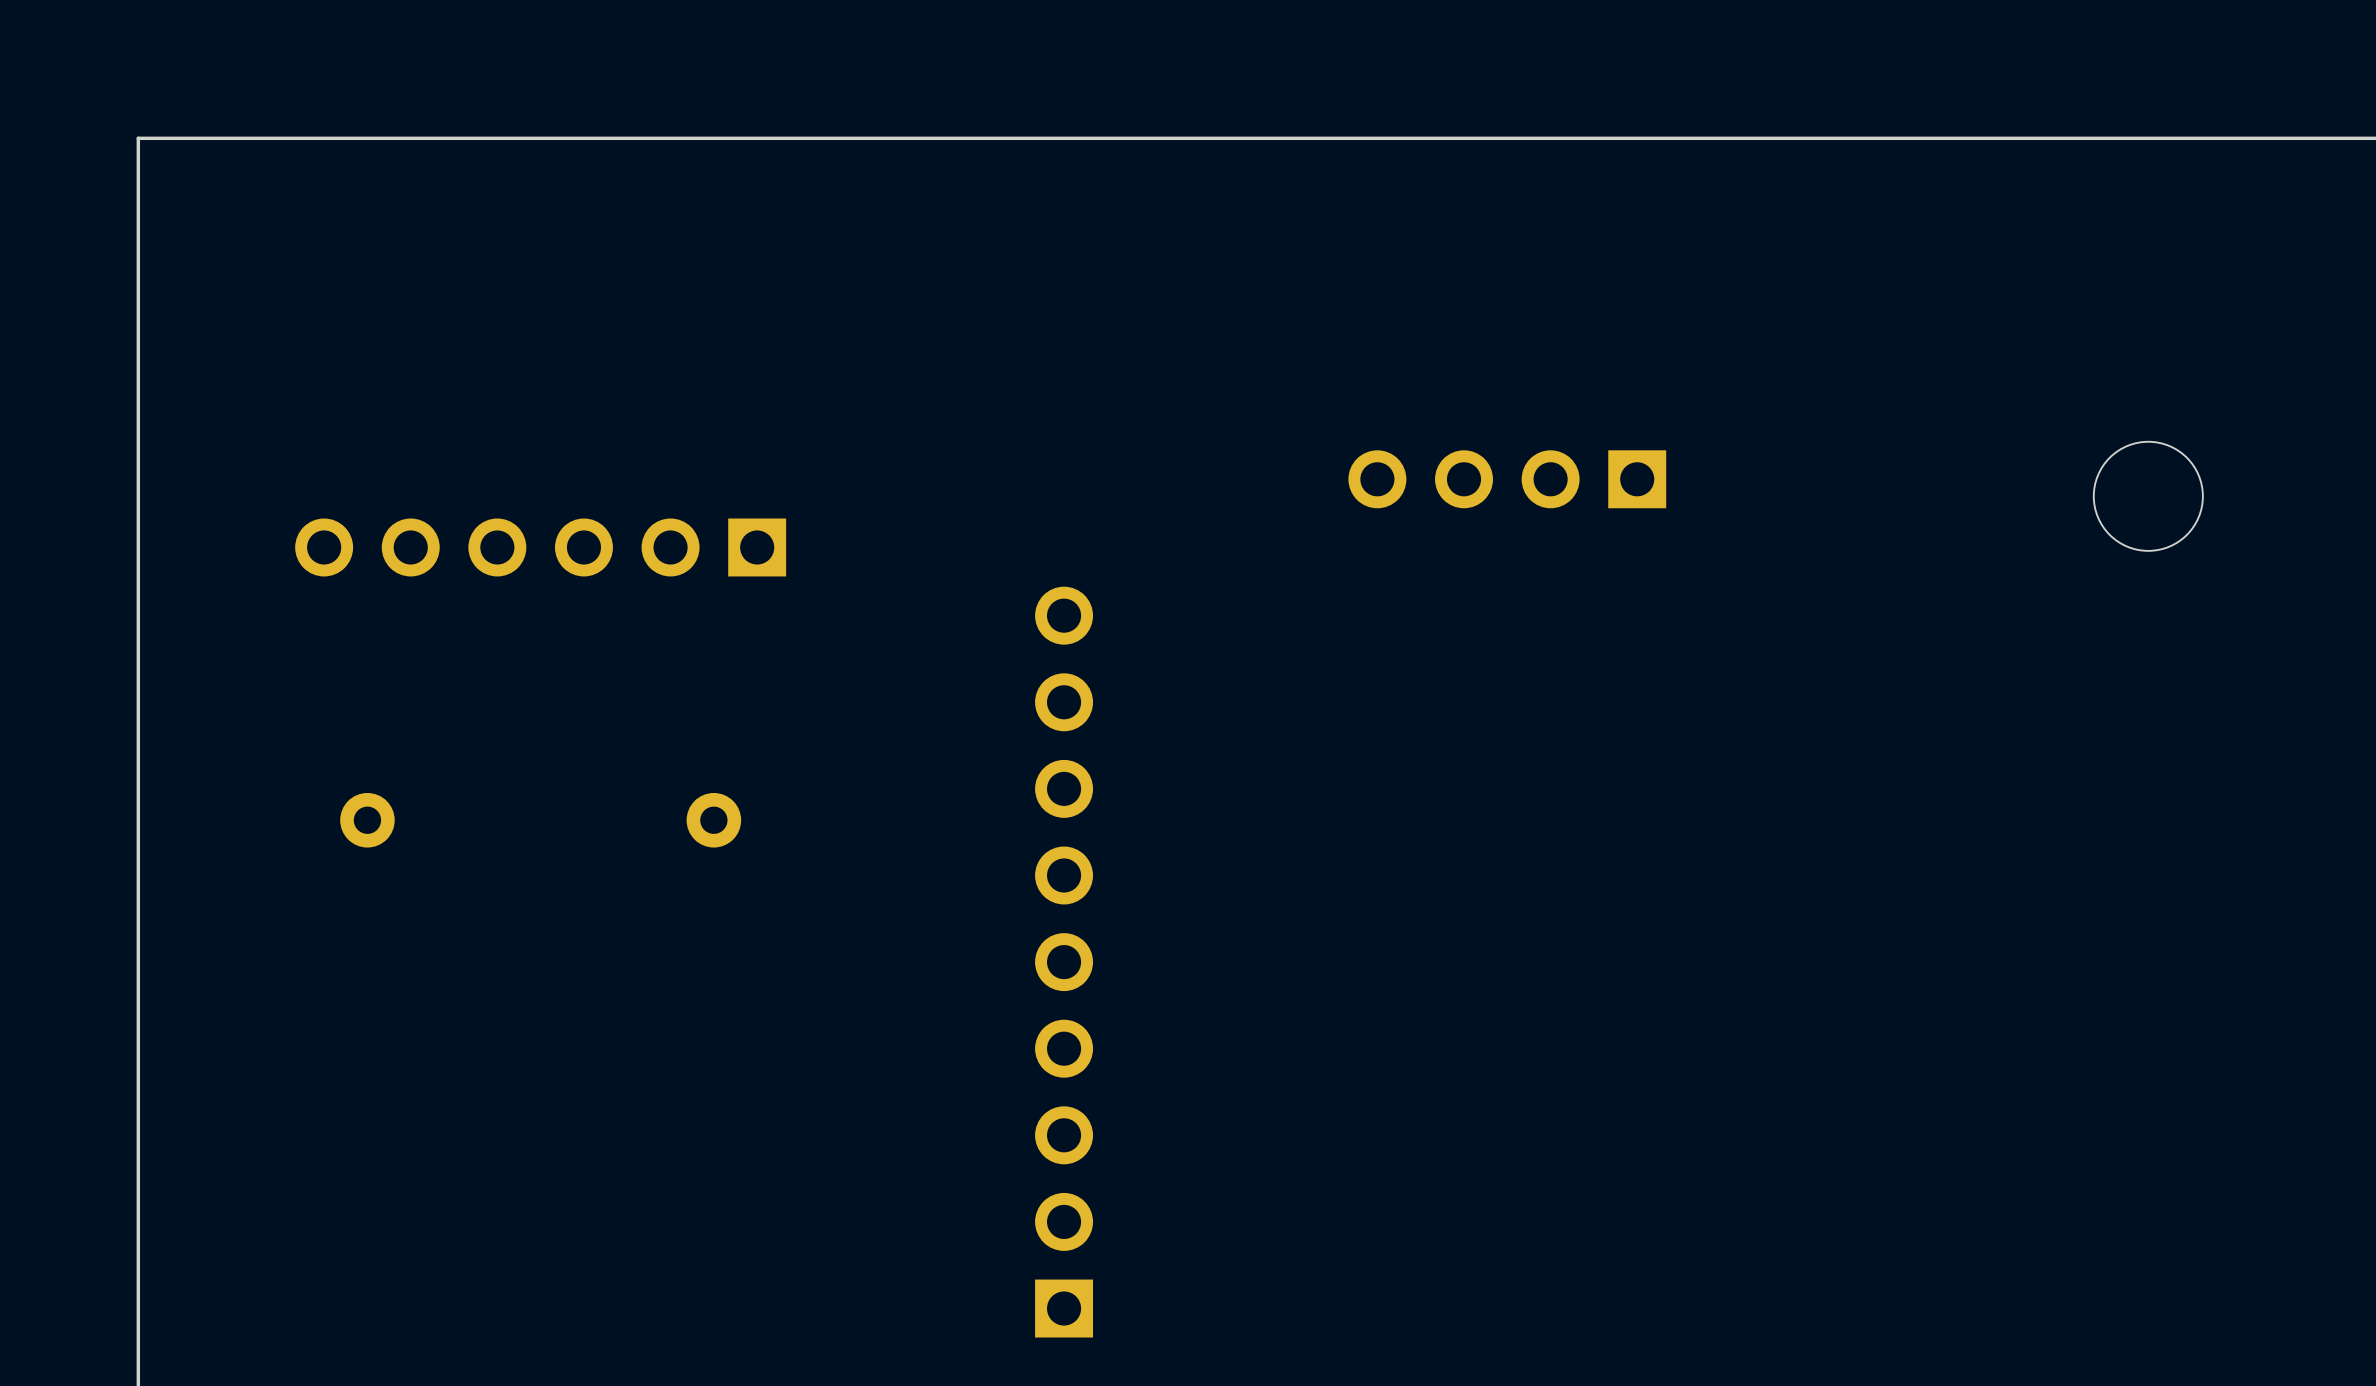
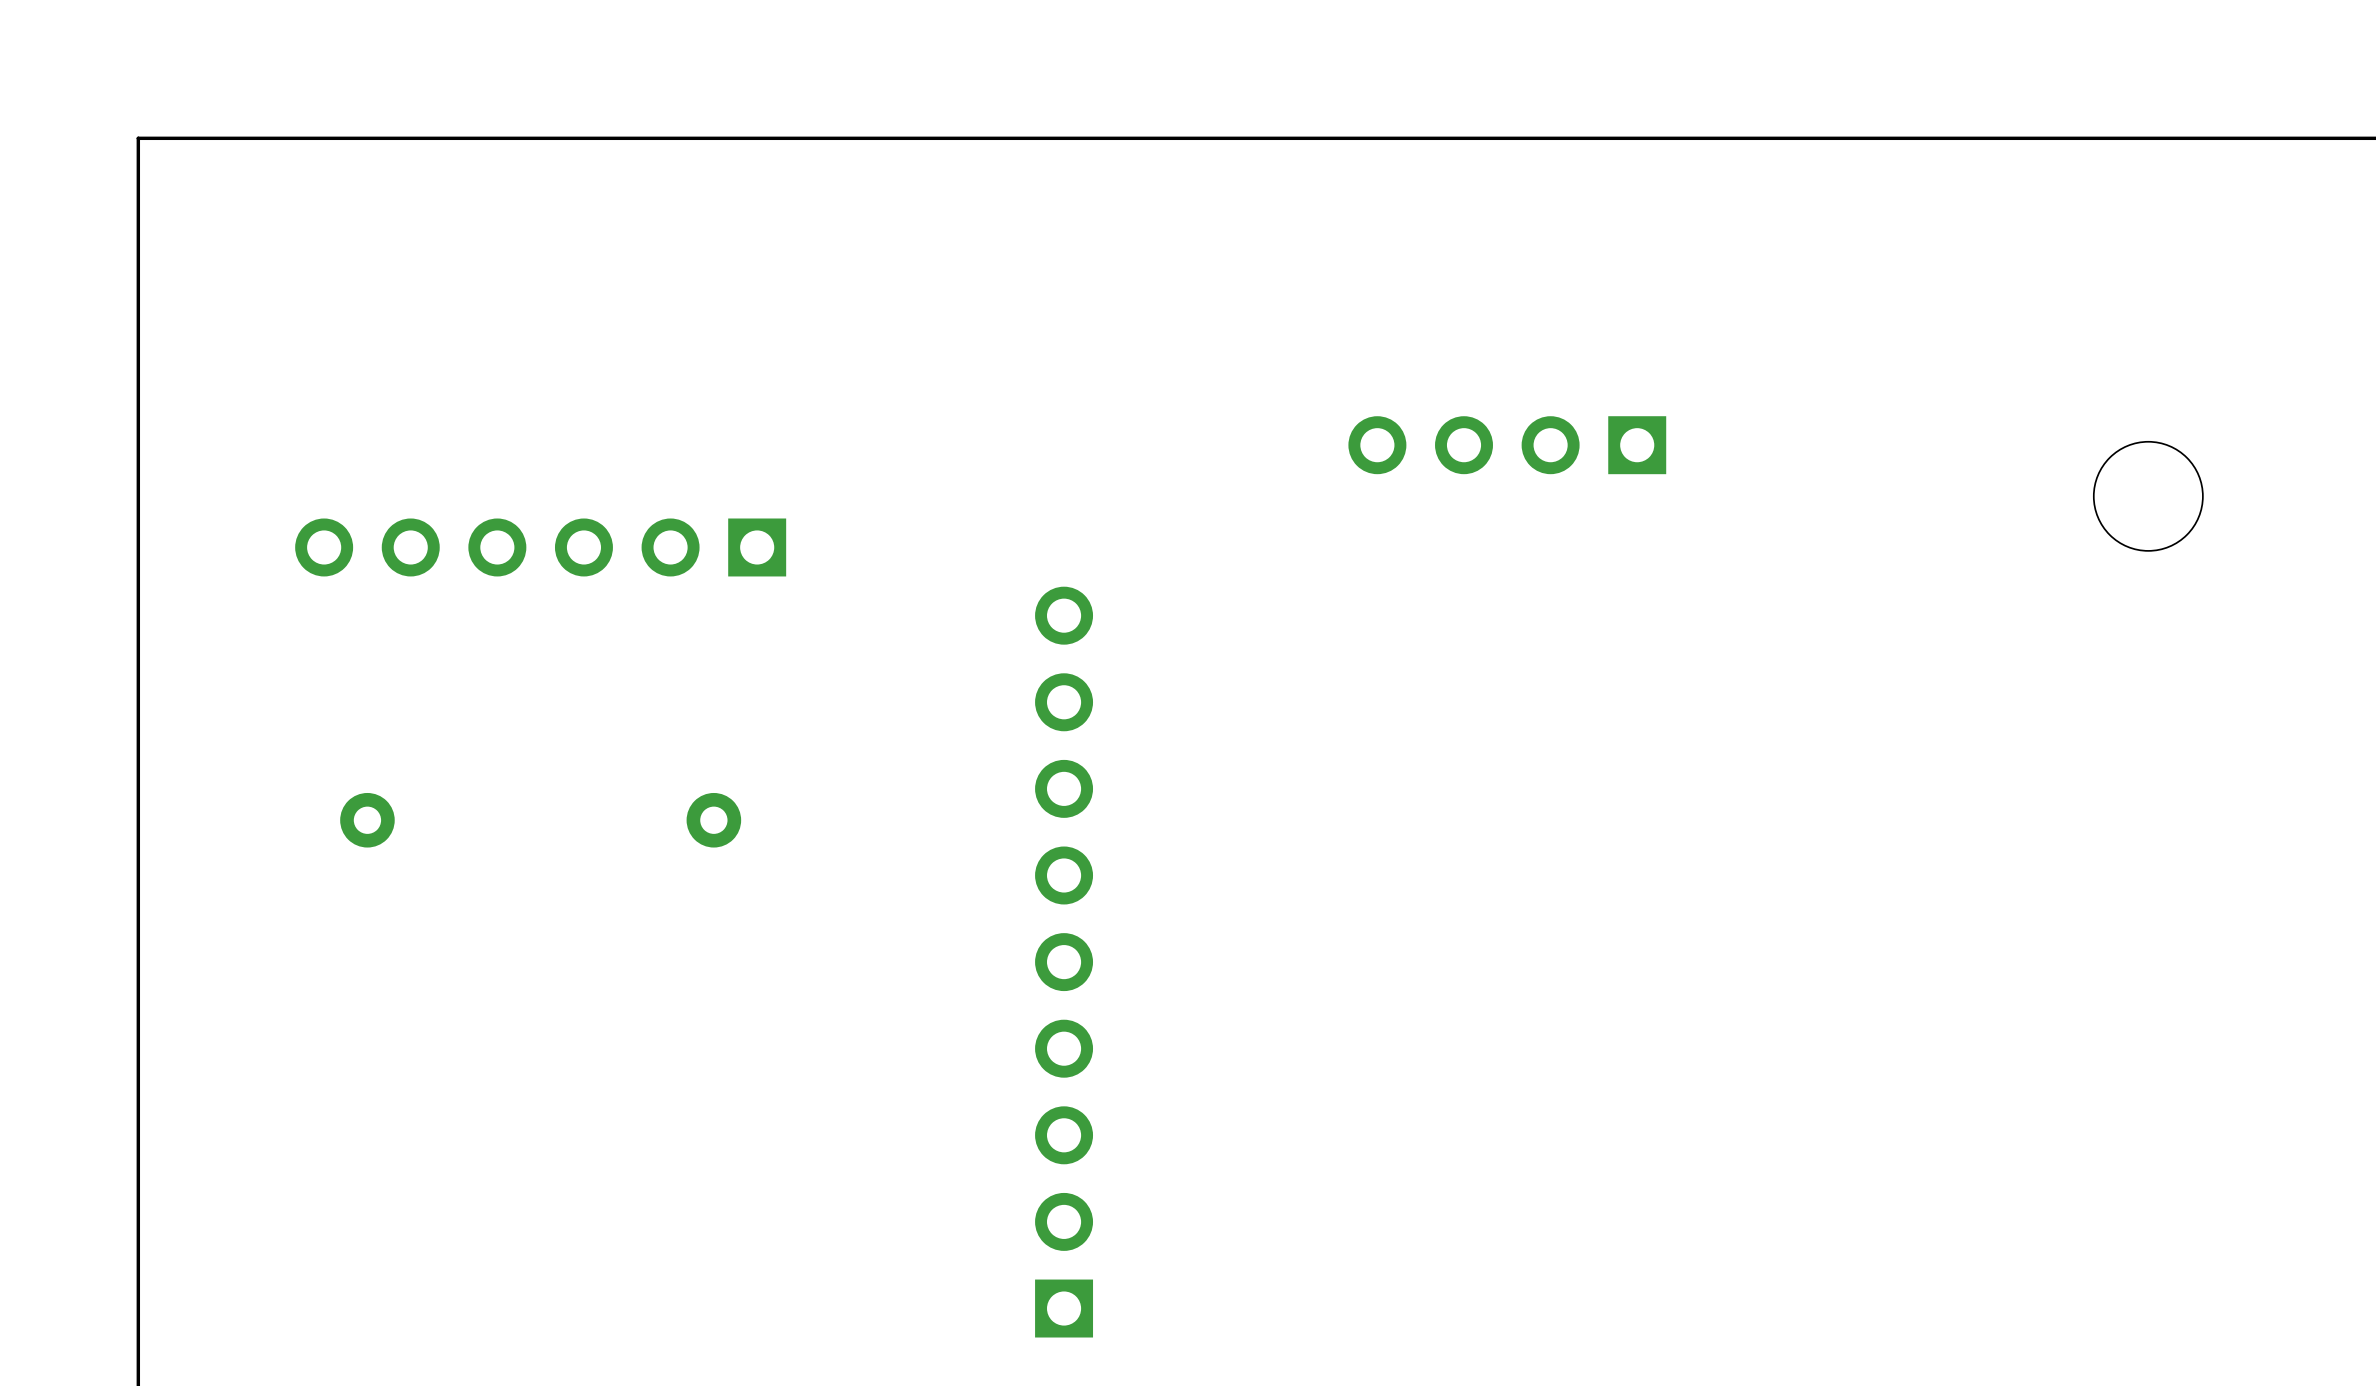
part position: (1507, 479) -> (1507, 445)

